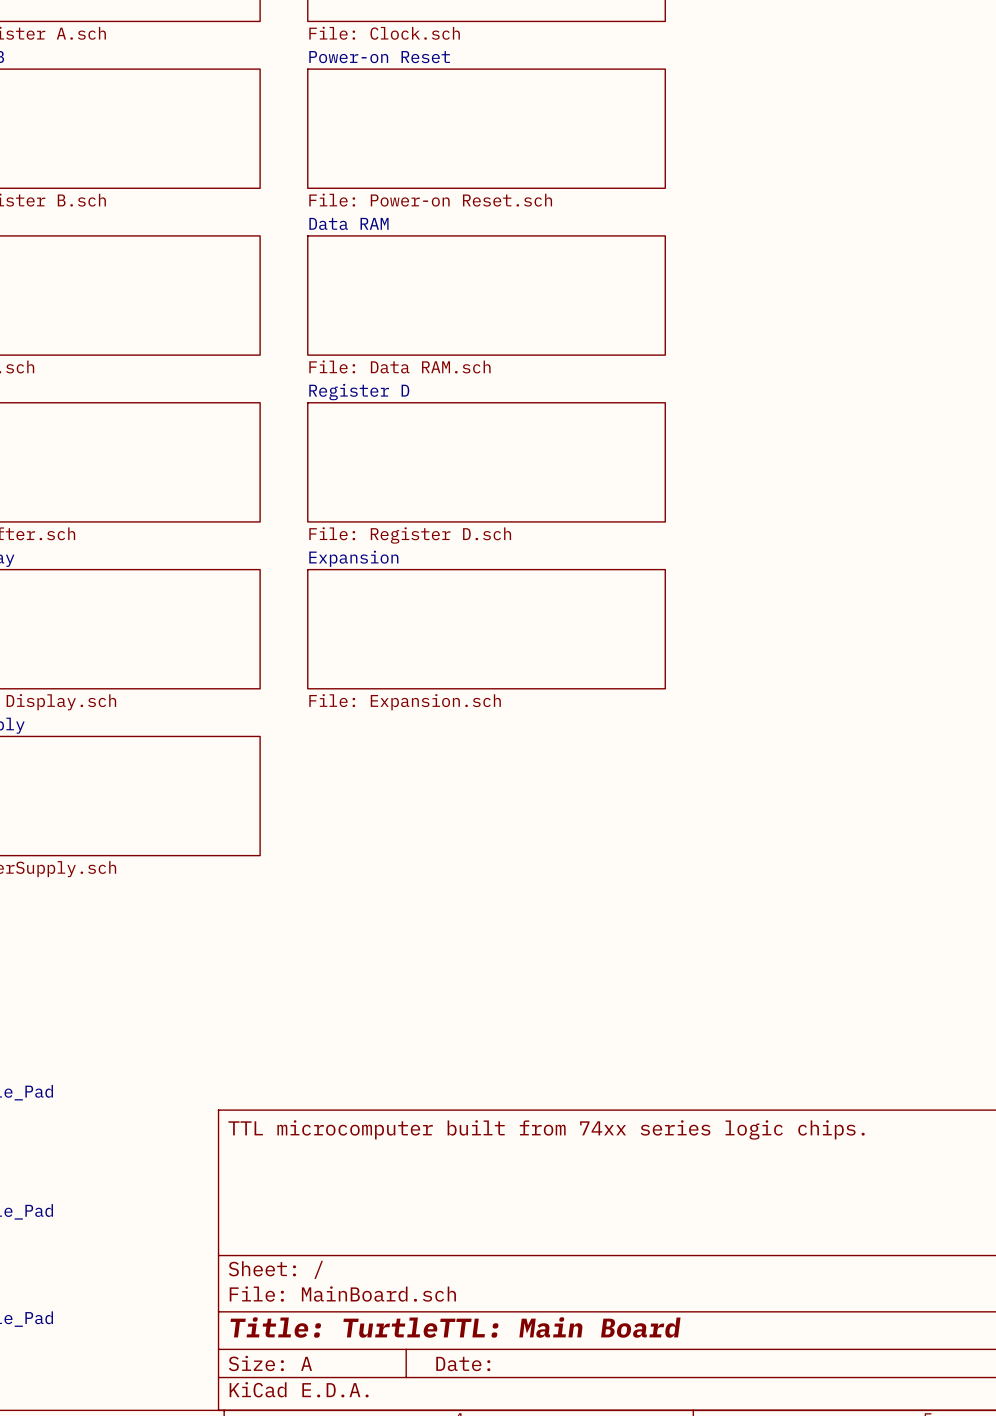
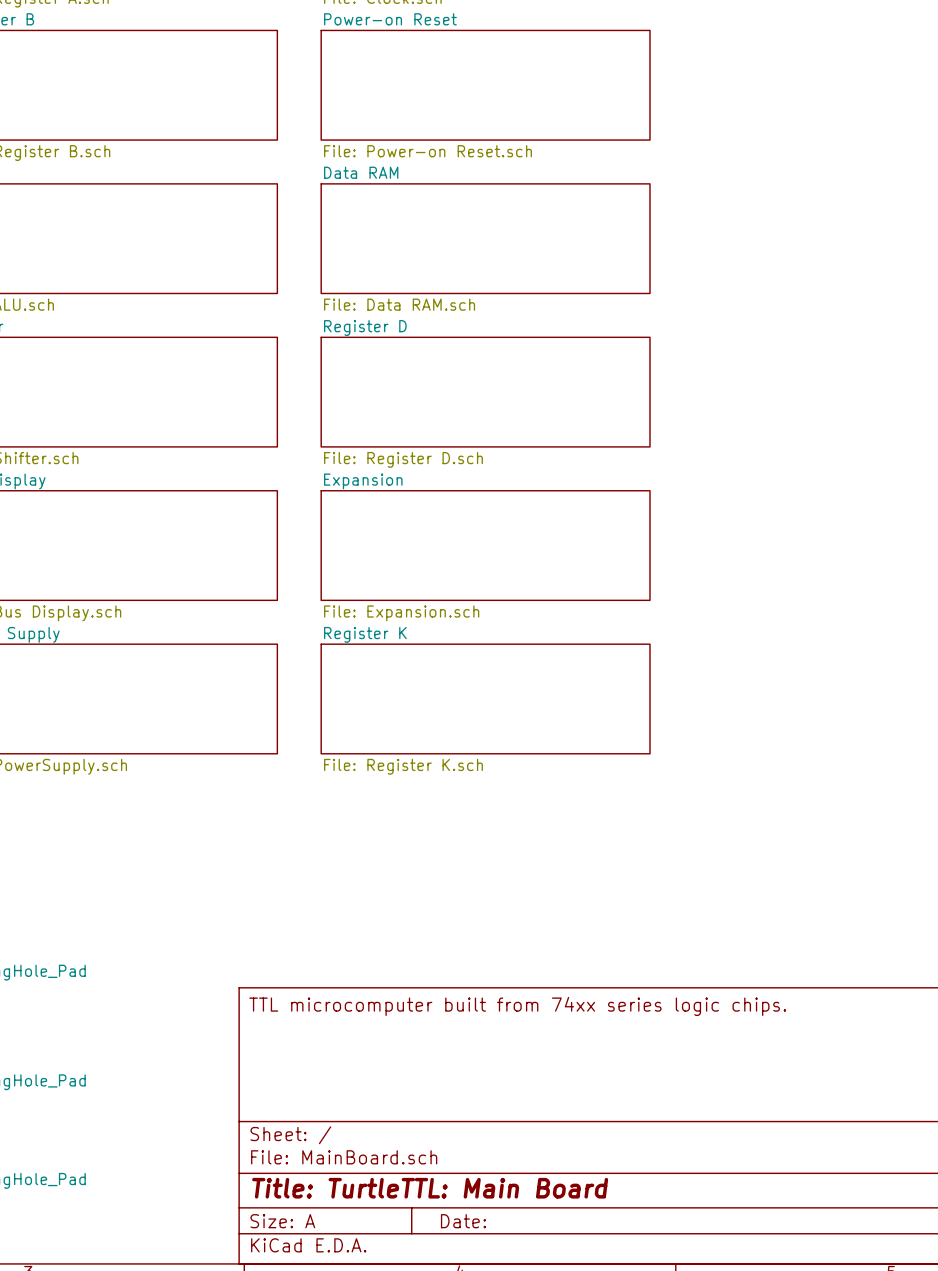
sheet Register K: none -> File: Register K.sch (485, 698)

